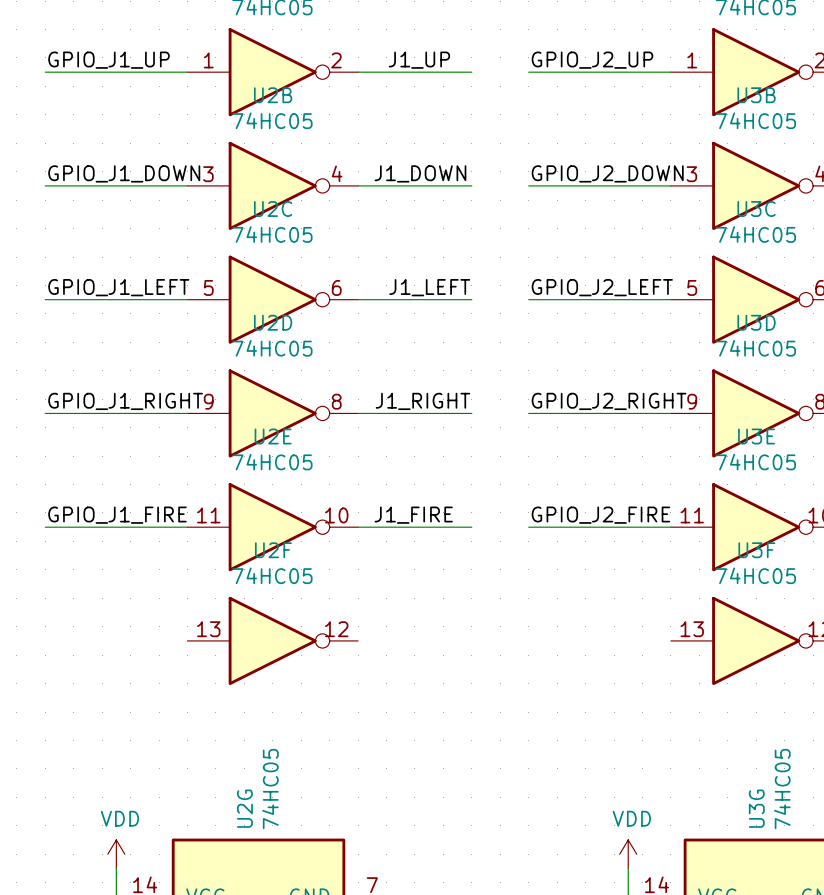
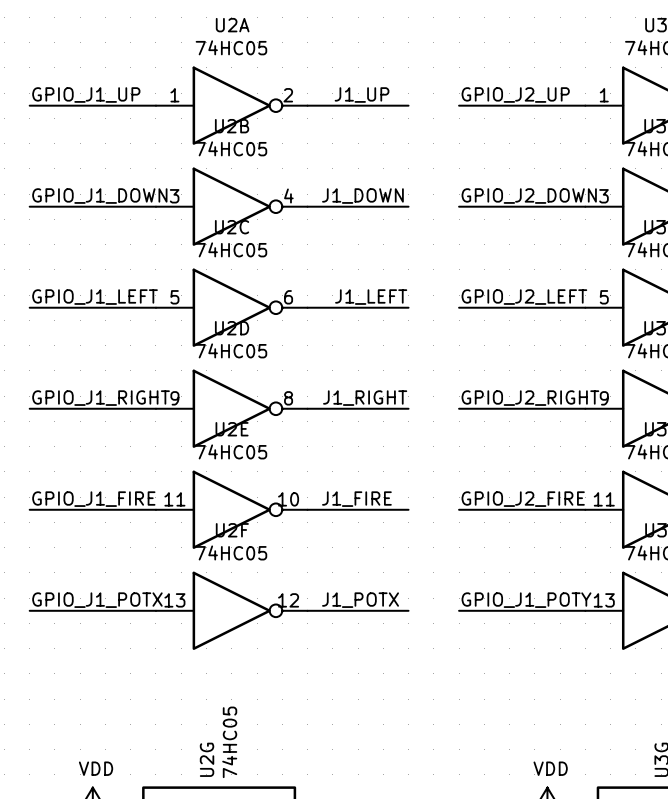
label: none -> GPIO_J1_POTX (97, 600)
label: none -> J1_POTX (360, 600)
label: none -> GPIO_J1_POTY (526, 600)
wire: none -> (29, 610) (155, 610)
wire: none -> (307, 610) (408, 610)
wire: none -> (459, 610) (585, 610)

